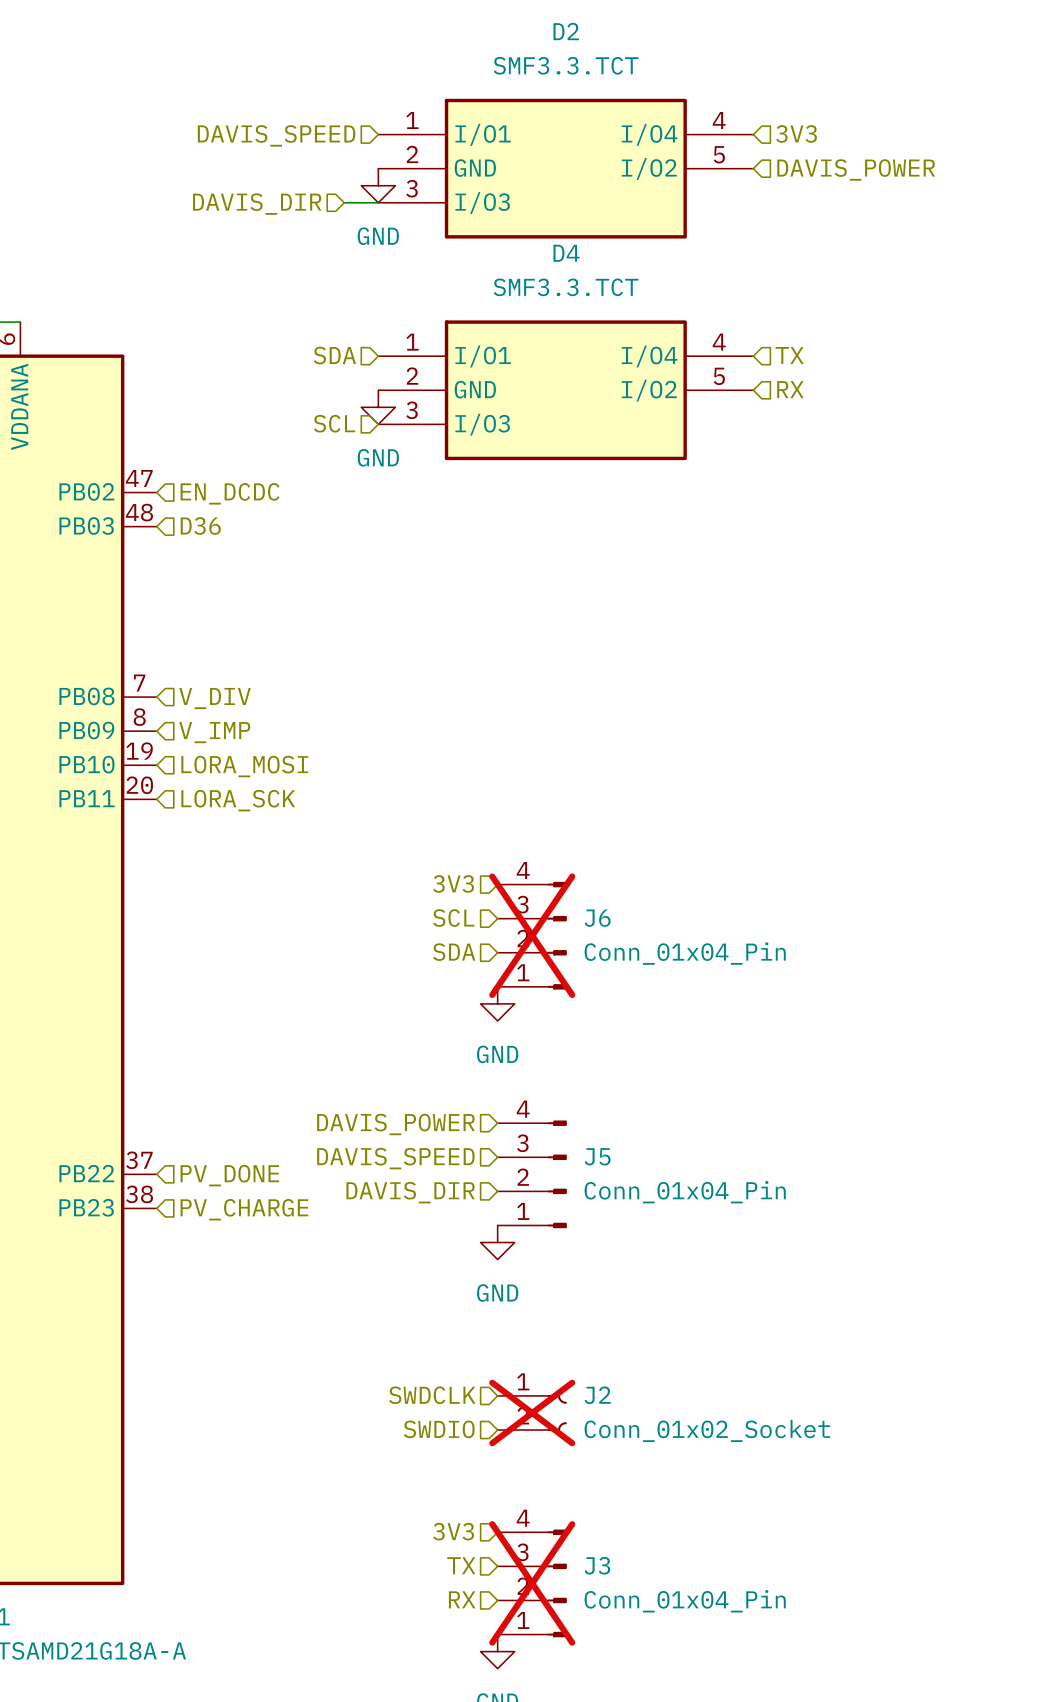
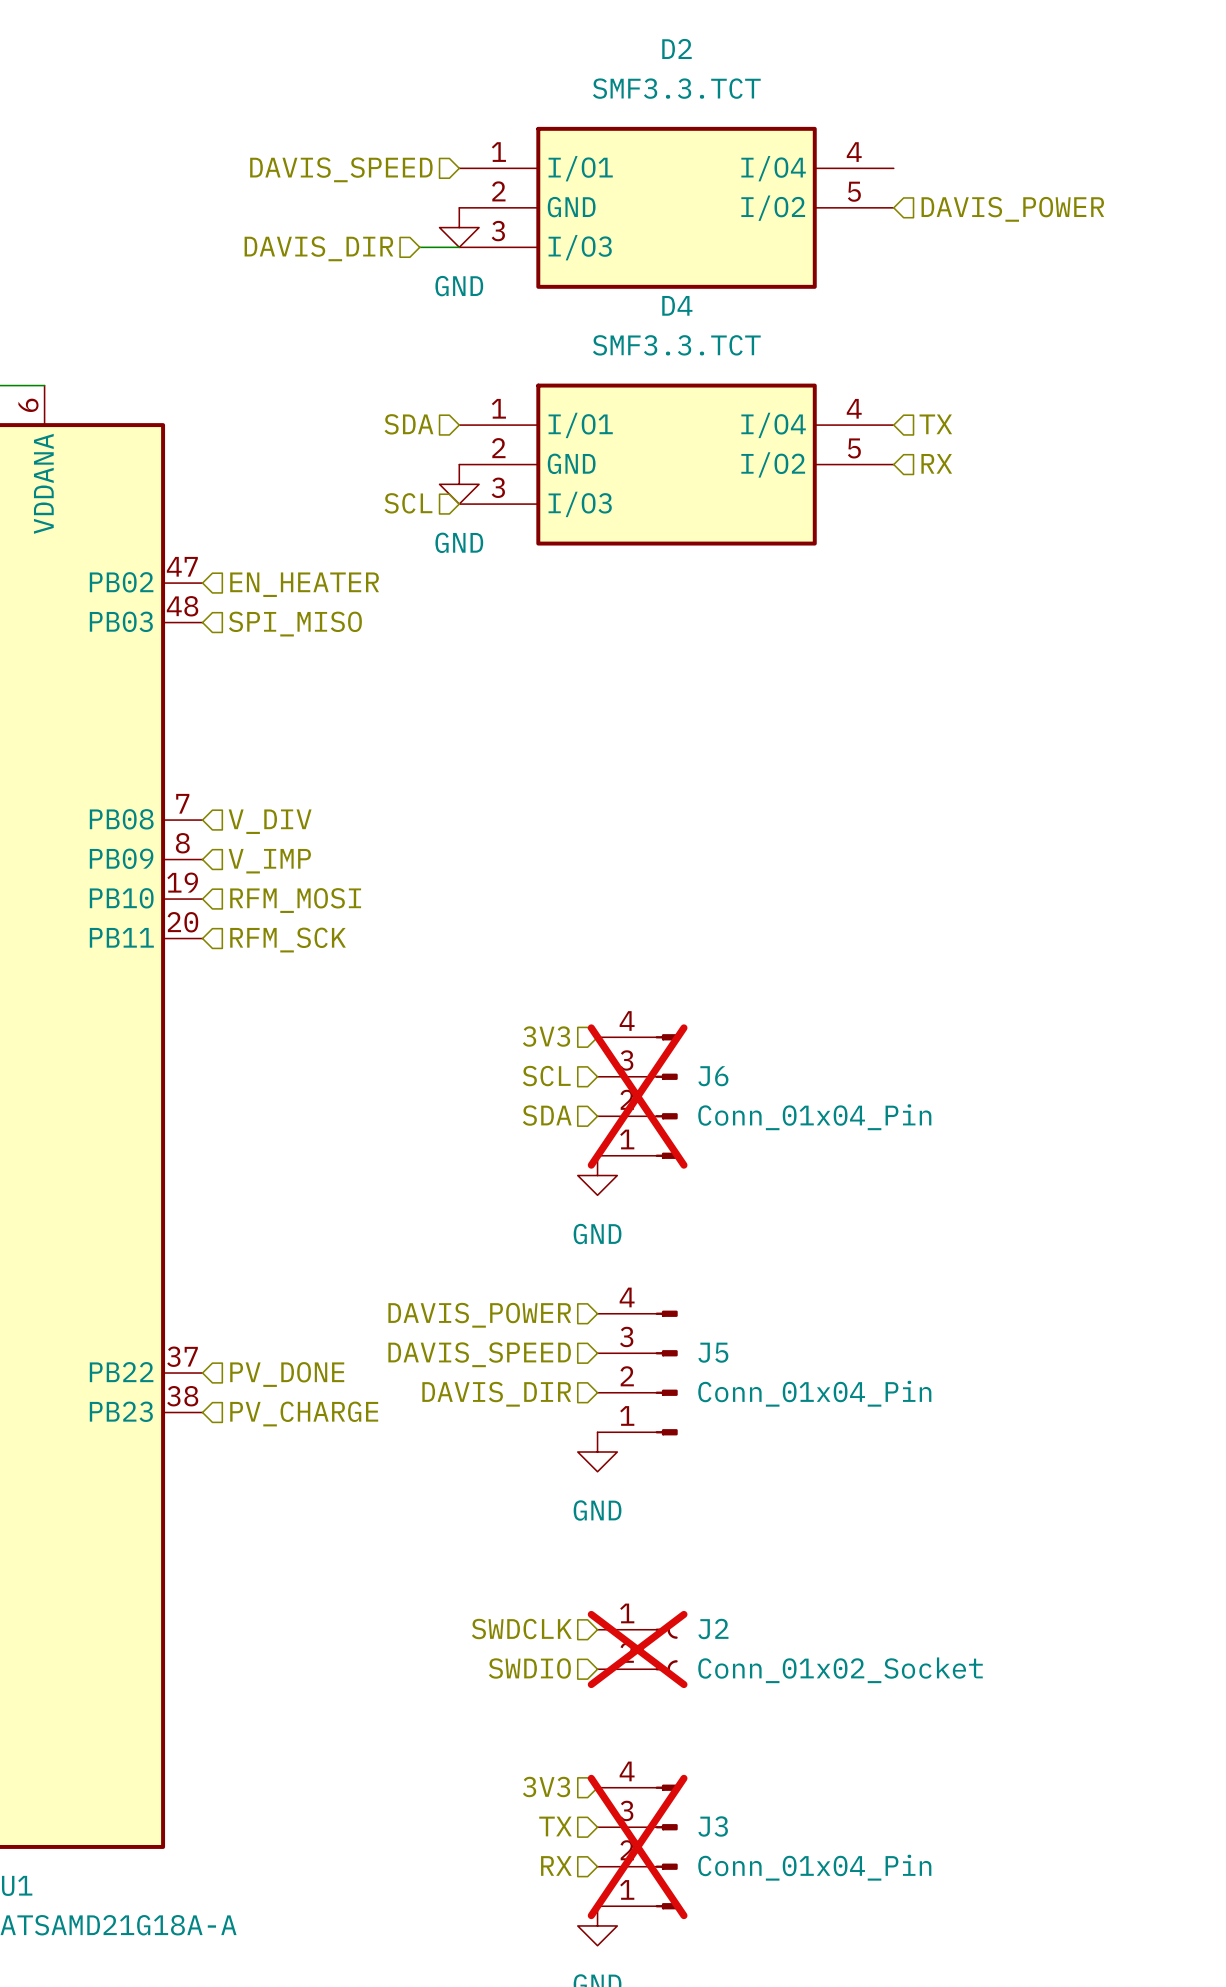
hierarchical label: 3V3 (796, 133) -> none
hierarchical label: EN_DCDC (230, 493) -> EN_HEATER (304, 584)
hierarchical label: D36 (200, 525) -> SPI_MISO (295, 624)
hierarchical label: LORA_MOSI (244, 766) -> RFM_MOSI (295, 900)
hierarchical label: LORA_SCK (238, 800) -> RFM_SCK (288, 940)

